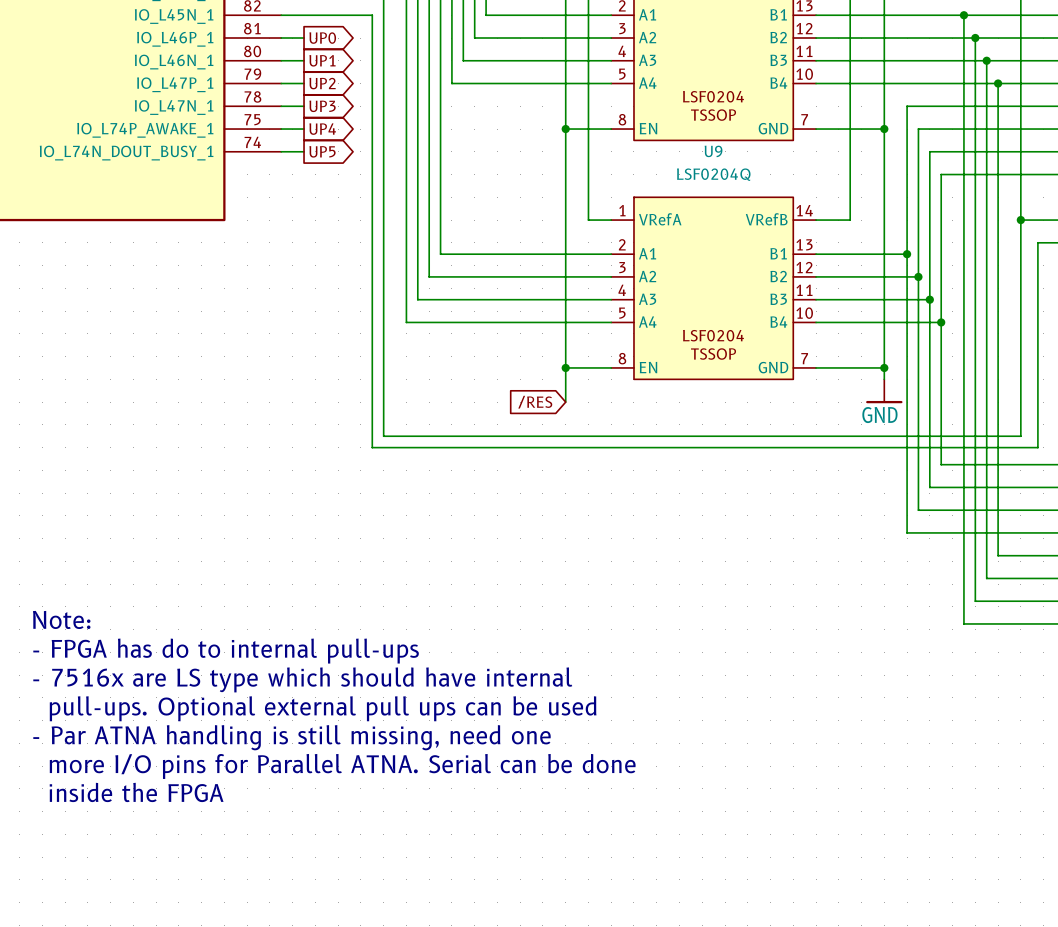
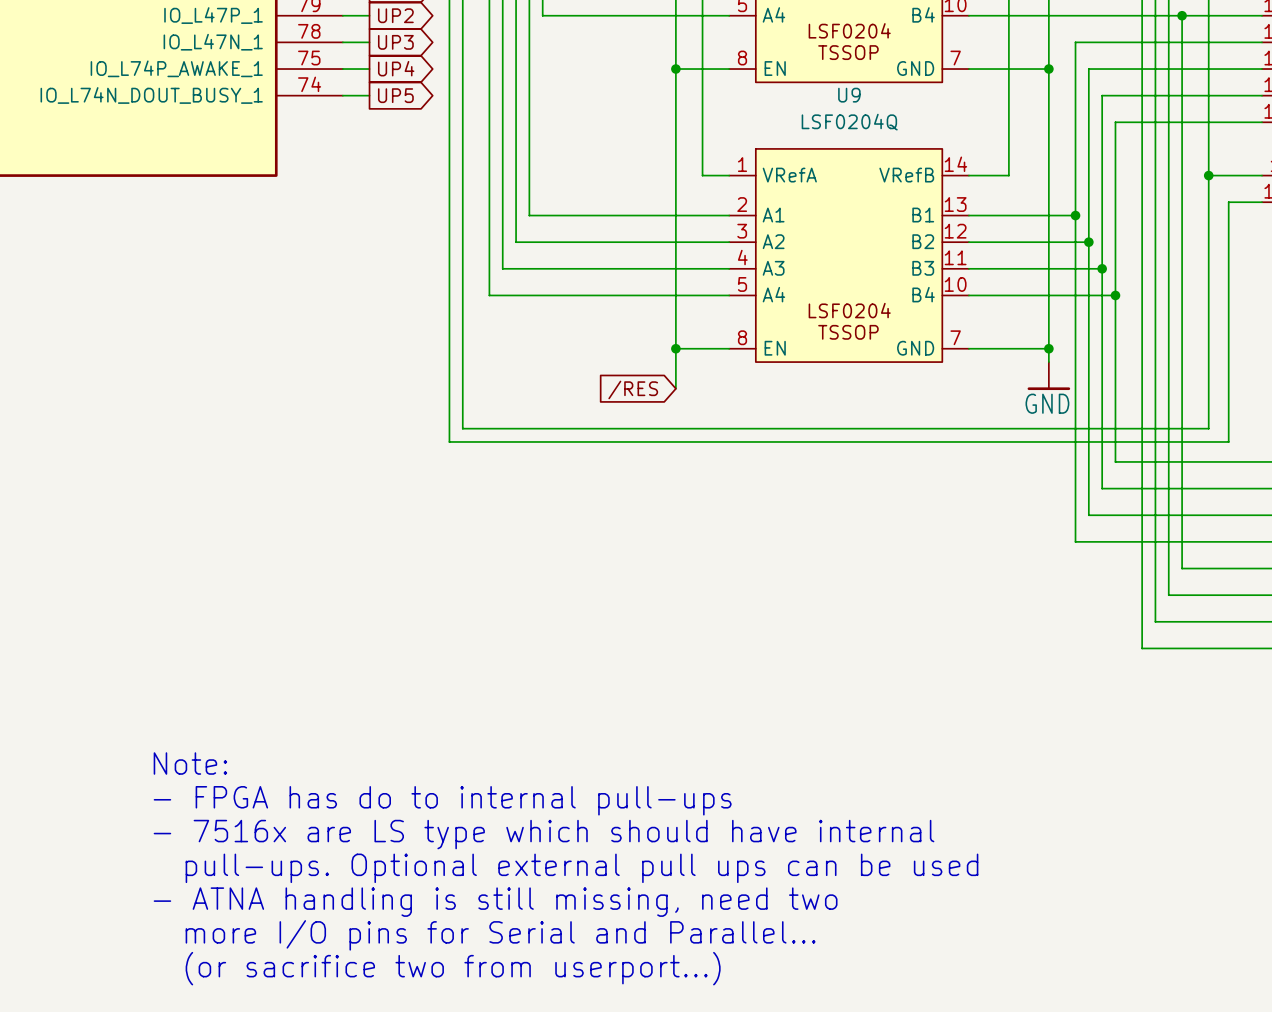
text position: Note: (61, 619) -> Note: (190, 763)
text position: - FPGA has do to internal pull-ups (226, 651) -> - FPGA has do to internal pull-ups (442, 800)
text position: - 7516x are LS type which should have internal (302, 679) -> - 7516x are LS type which should have internal (544, 834)
text position: pull-ups. Optional external pull ups can be used (323, 708) -> pull-ups. Optional external pull ups can be used (581, 868)
text: - Par ATNA handling is still missing, need one (292, 737) -> none
text: more I/O pins for Parallel ATNA. Serial can be done (342, 766) -> none
text: inside the FPGA (136, 792) -> none
text: none -> - ATNA handling is still missing, need two (495, 902)
text: none -> more I/O pins for Serial and Parallel... (500, 935)
text: none -> (or sacrifice two from userport...) (453, 968)

